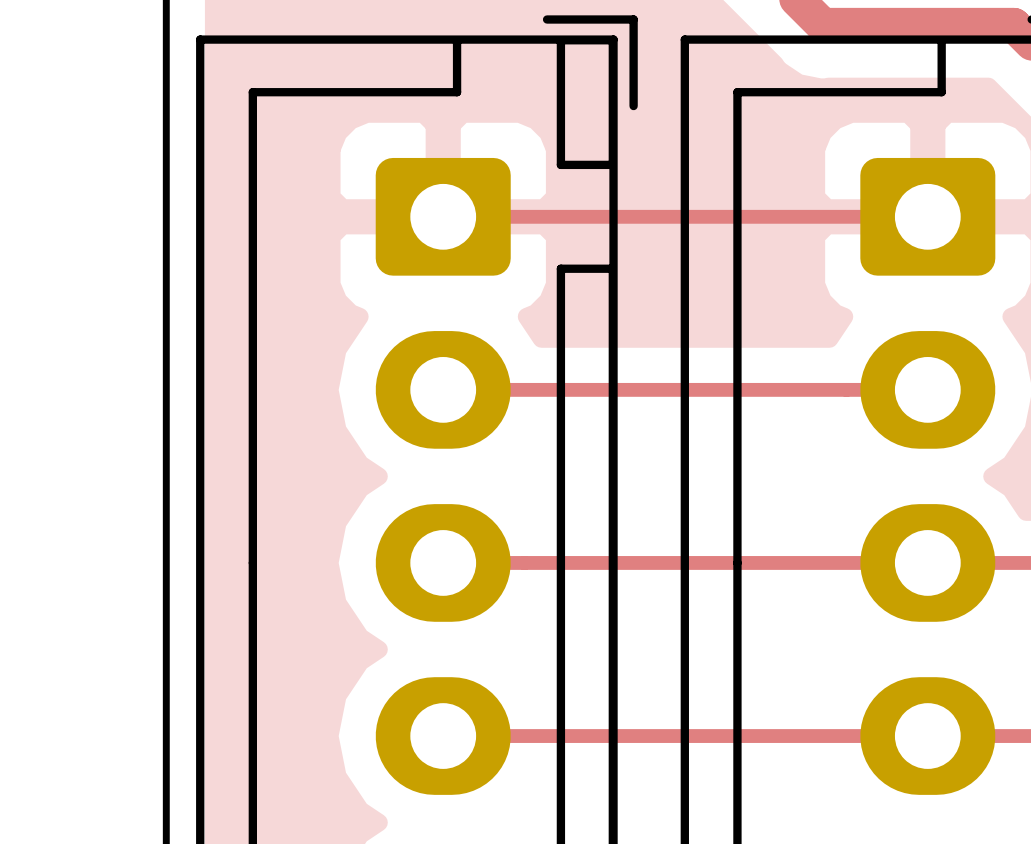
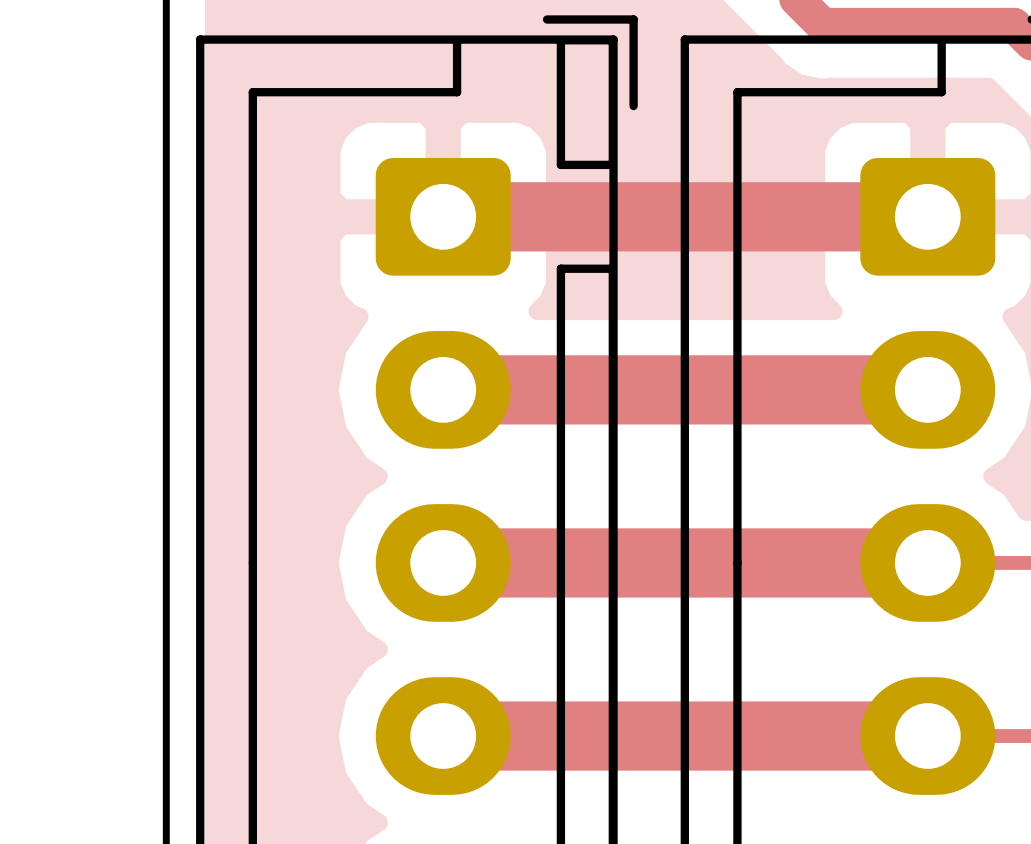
track width: thin (443, 216) (927, 216) -> thick (443, 216) (927, 216)
track width: thin (443, 389) (927, 389) -> thick (443, 389) (927, 389)
track width: thin (443, 562) (927, 562) -> thick (443, 562) (927, 562)
track width: thin (443, 736) (927, 736) -> thick (443, 736) (927, 736)

